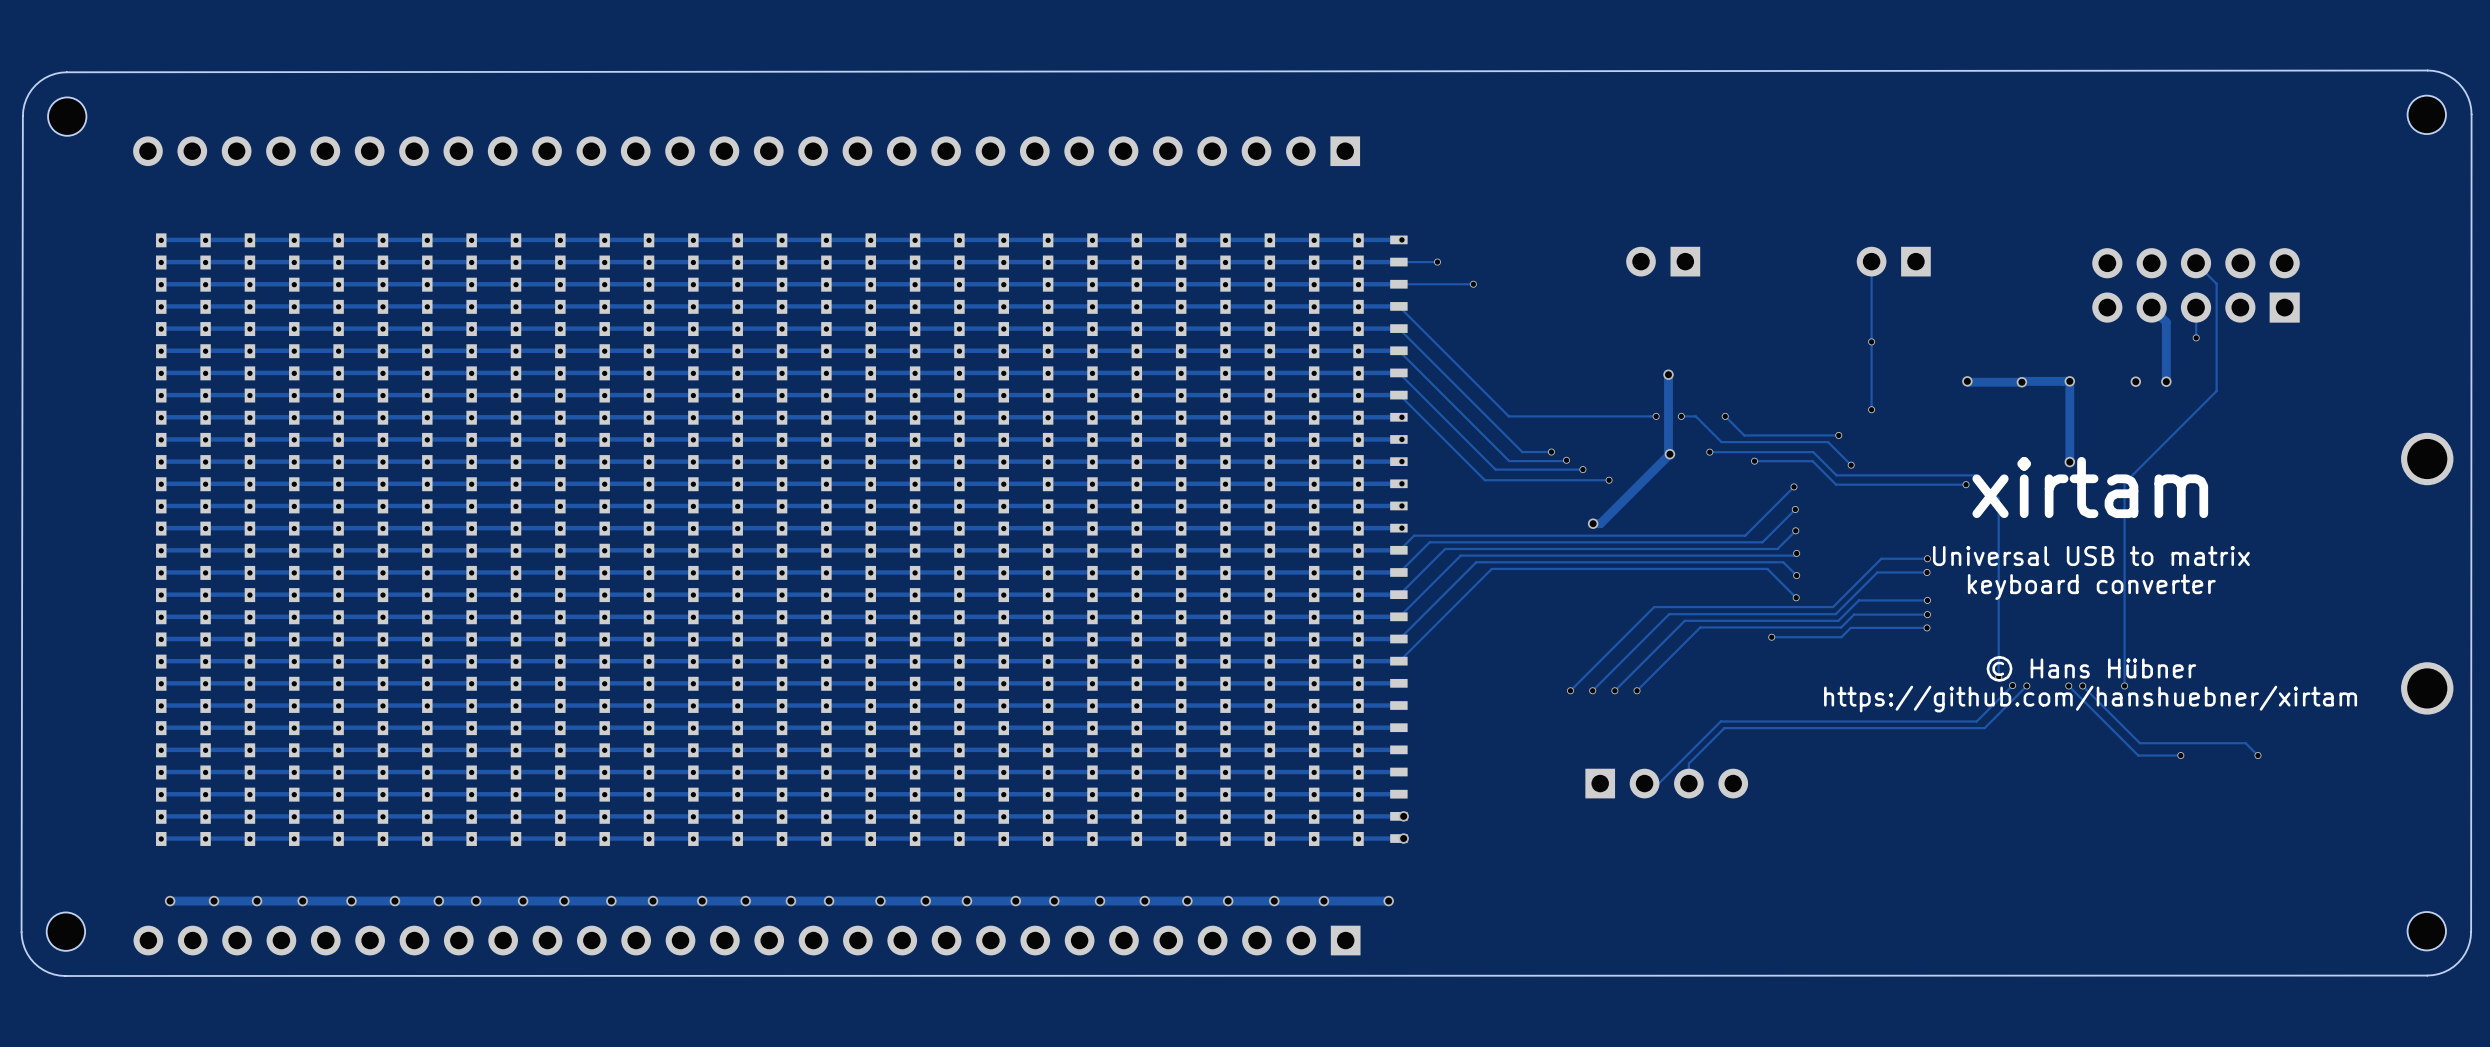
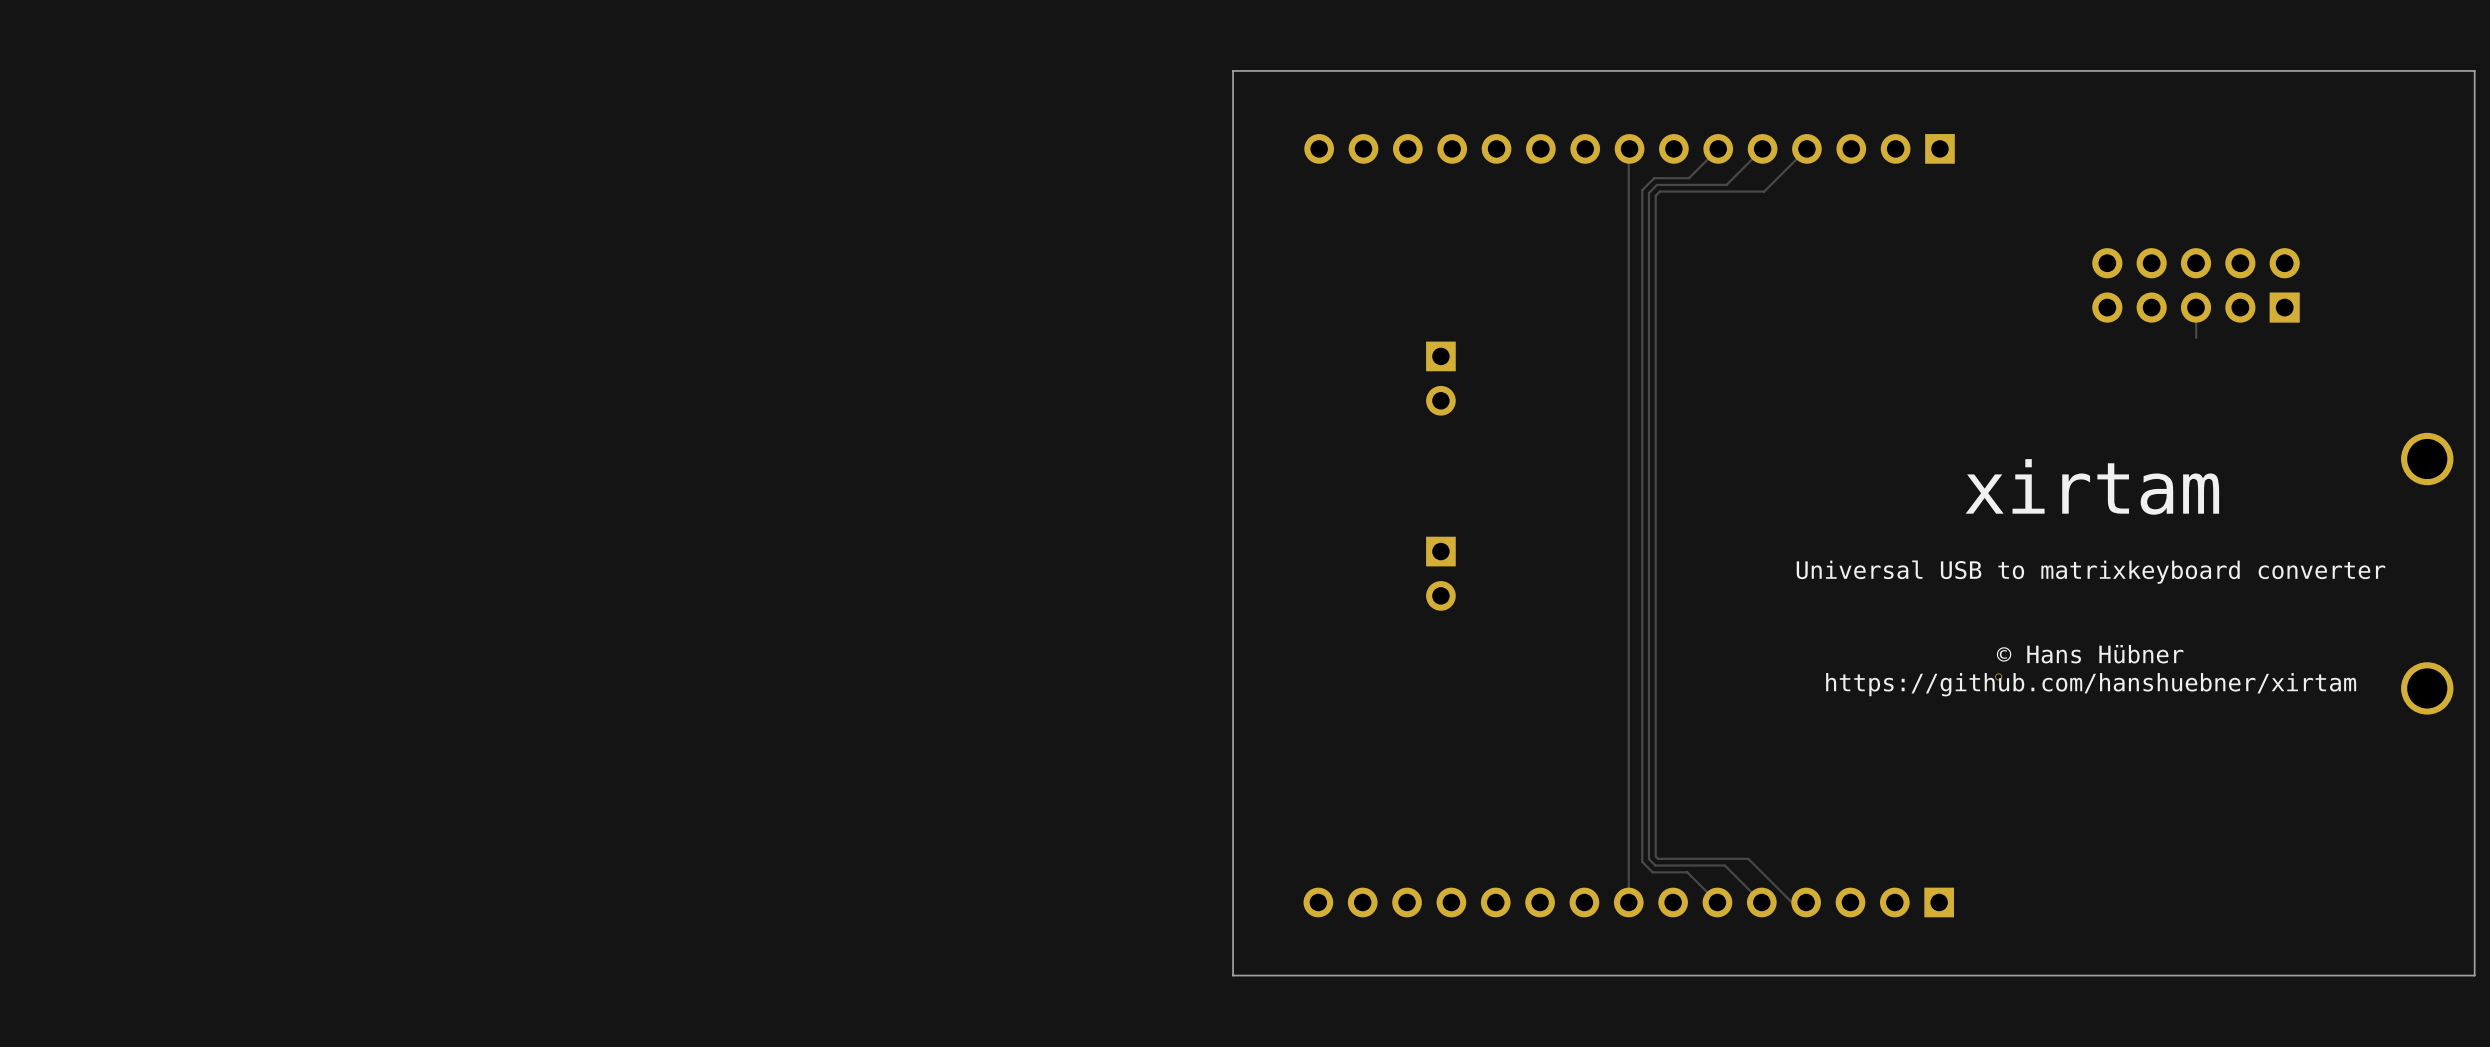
board edge: (2427, 70) (66, 72) (49, 75) (31, 89) (26, 99) (22, 116) (21, 932) (24, 948) (30, 958) (43, 970) (65, 976) (2427, 975) (2444, 972) (2462, 958) (2467, 948) (2471, 931) (2471, 114) (2468, 97) (2458, 83) (2444, 73) (2427, 70) -> (2474, 70) (2474, 975) (1233, 975) (1233, 70) (2474, 70)
part: (2426, 114) -> none
part: (67, 116) -> none
track: none -> (1629, 148) (1628, 902)
part: none -> (1629, 148)
track: none -> (1718, 148) (1688, 178) (1654, 178) (1642, 190) (1642, 861) (1652, 872) (1687, 872) (1717, 902)
track: none -> (1762, 148) (1726, 184) (1657, 184) (1648, 192) (1648, 859) (1655, 865) (1724, 865) (1761, 902)
track: none -> (1806, 148) (1764, 191) (1659, 191) (1655, 195) (1655, 856) (1658, 858) (1748, 858) (1791, 902) (1806, 902)
part: (746, 151) -> none
via: (1401, 239) -> none
part: (1663, 261) -> none
track: (1871, 261) (1871, 409) -> none
part: (1893, 261) -> none
track: (1437, 262) (1399, 262) -> none
via: (1437, 262) -> none
track: (2196, 263) (2216, 283) (2216, 391) (2124, 483) (2124, 685) -> none
track: (1473, 284) (1399, 284) -> none
via: (1473, 284) -> none
track: (1399, 307) (1508, 416) (1656, 416) -> none
track: (2151, 307) (2166, 322) (2166, 381) -> none
track: (1399, 329) (1522, 452) (1551, 452) -> none
via: (2196, 337) -> none
via: (1871, 341) -> none
track: (1399, 351) (1509, 461) (1566, 460) -> none
track: (1399, 373) (1495, 469) (1582, 469) -> none
track: (1668, 374) (1669, 454) (1600, 523) (1593, 523) -> none
via: (1668, 374) -> none
part: none -> (1440, 378)
track: (1967, 381) (2069, 381) (2069, 462) -> none
via: (1967, 381) -> none
via: (2069, 381) -> none
via: (2135, 381) -> none
via: (2166, 381) -> none
via: (2021, 382) -> none
track: (1399, 395) (1484, 480) (1609, 480) -> none
via: (1871, 409) -> none
via: (1656, 416) -> none
track: (1681, 416) (1695, 416) (1721, 442) (1828, 442) (1851, 465) -> none
via: (1681, 416) -> none
track: (1725, 416) (1744, 435) (1838, 435) -> none
via: (1725, 416) -> none
via: (1401, 417) -> none
via: (1838, 435) -> none
via: (1401, 439) -> none
via: (1551, 452) -> none
track: (1709, 452) (1813, 452) (1836, 475) (1975, 475) (1998, 498) (1998, 676) -> none
via: (1709, 452) -> none
via: (1669, 454) -> none
via: (1566, 460) -> none
via: (1401, 461) -> none
track: (1754, 461) (1812, 461) (1836, 484) (1966, 484) -> none
via: (1754, 461) -> none
via: (2069, 462) -> none
via: (1851, 465) -> none
via: (1582, 469) -> none
via: (1609, 480) -> none
via: (1401, 483) -> none
via: (1966, 484) -> none
track: (1793, 486) (1745, 535) (1414, 535) (1399, 550) -> none
via: (1793, 486) -> none
via: (1401, 505) -> none
track: (1795, 509) (1762, 542) (1429, 542) (1399, 572) -> none
via: (1795, 509) -> none
via: (1593, 523) -> none
via: (1401, 528) -> none
track: (1795, 530) (1777, 548) (1445, 548) (1399, 594) -> none
via: (1795, 530) -> none
part: (781, 539) -> none
track: (1796, 553) (1794, 555) (1460, 555) (1399, 616) -> none
via: (1796, 553) -> none
text: Universal USB to matrix (2091, 556) -> Universal USB to matrix keyboard converter (2090, 572)
track: (1927, 558) (1881, 558) (1833, 607) (1654, 607) (1570, 690) -> none
via: (1927, 558) -> none
track: (1927, 572) (1877, 572) (1835, 614) (1669, 614) (1592, 690) -> none
via: (1927, 572) -> none
part: none -> (1440, 573)
track: (1796, 575) (1783, 562) (1476, 562) (1399, 638) -> none
via: (1796, 575) -> none
text: keyboard converter (2091, 587) -> none
track: (1796, 597) (1767, 568) (1491, 568) (1399, 661) -> none
via: (1796, 597) -> none
track: (1927, 600) (1858, 600) (1838, 620) (1684, 620) (1614, 690) -> none
via: (1927, 600) -> none
track: (1927, 614) (1854, 614) (1841, 627) (1700, 627) (1637, 690) -> none
via: (1927, 614) -> none
track: (1927, 627) (1850, 627) (1841, 637) (1771, 637) -> none
via: (1927, 627) -> none
via: (1771, 637) -> none
text position: © Hans Hübner (2091, 668) -> © Hans Hübner (2090, 654)
track: (2012, 685) (1976, 721) (1720, 721) (1658, 783) (1644, 783) -> none
via: (2012, 685) -> none
track: (2026, 685) (1984, 728) (1724, 728) (1688, 763) (1688, 783) -> none
via: (2026, 685) -> none
track: (2068, 685) (2138, 755) (2180, 755) -> none
via: (2068, 685) -> none
track: (2082, 685) (2139, 743) (2245, 743) (2257, 755) -> none
via: (2082, 685) -> none
via: (2124, 685) -> none
via: (1570, 690) -> none
via: (1592, 690) -> none
via: (1614, 690) -> none
via: (1637, 690) -> none
text position: https://github.com/hanshuebner/xirtam (2090, 699) -> https://github.com/hanshuebner/xirtam (2091, 684)
via: (2180, 755) -> none
via: (2257, 755) -> none
part: (1666, 783) -> none
via: (1403, 816) -> none
via: (1403, 838) -> none
via: (170, 901) -> none
via: (214, 901) -> none
via: (257, 901) -> none
via: (302, 901) -> none
via: (351, 901) -> none
via: (394, 901) -> none
via: (438, 901) -> none
via: (476, 901) -> none
via: (523, 901) -> none
via: (564, 901) -> none
via: (611, 901) -> none
via: (653, 901) -> none
via: (702, 901) -> none
via: (745, 901) -> none
via: (790, 901) -> none
via: (829, 901) -> none
via: (880, 901) -> none
via: (925, 901) -> none
via: (966, 901) -> none
via: (1015, 901) -> none
via: (1054, 901) -> none
via: (1100, 901) -> none
via: (1144, 901) -> none
via: (1187, 901) -> none
via: (1228, 901) -> none
via: (1274, 901) -> none
via: (1323, 901) -> none
track: (1388, 901) (170, 901) -> none
via: (1388, 901) -> none
part: none -> (1628, 902)
part: (65, 931) -> none
part: (2426, 931) -> none
part: (747, 940) -> none

